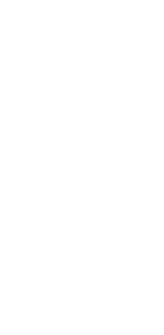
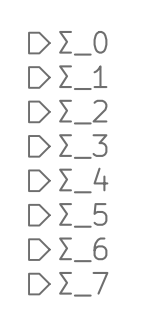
hierarchical label: none -> Σ_0 (83, 43)
hierarchical label: none -> Σ_1 (83, 77)
hierarchical label: none -> Σ_2 (83, 112)
hierarchical label: none -> Σ_3 (83, 146)
hierarchical label: none -> Σ_4 (83, 180)
hierarchical label: none -> Σ_5 (83, 215)
hierarchical label: none -> Σ_6 (83, 249)
hierarchical label: none -> Σ_7 (83, 284)

